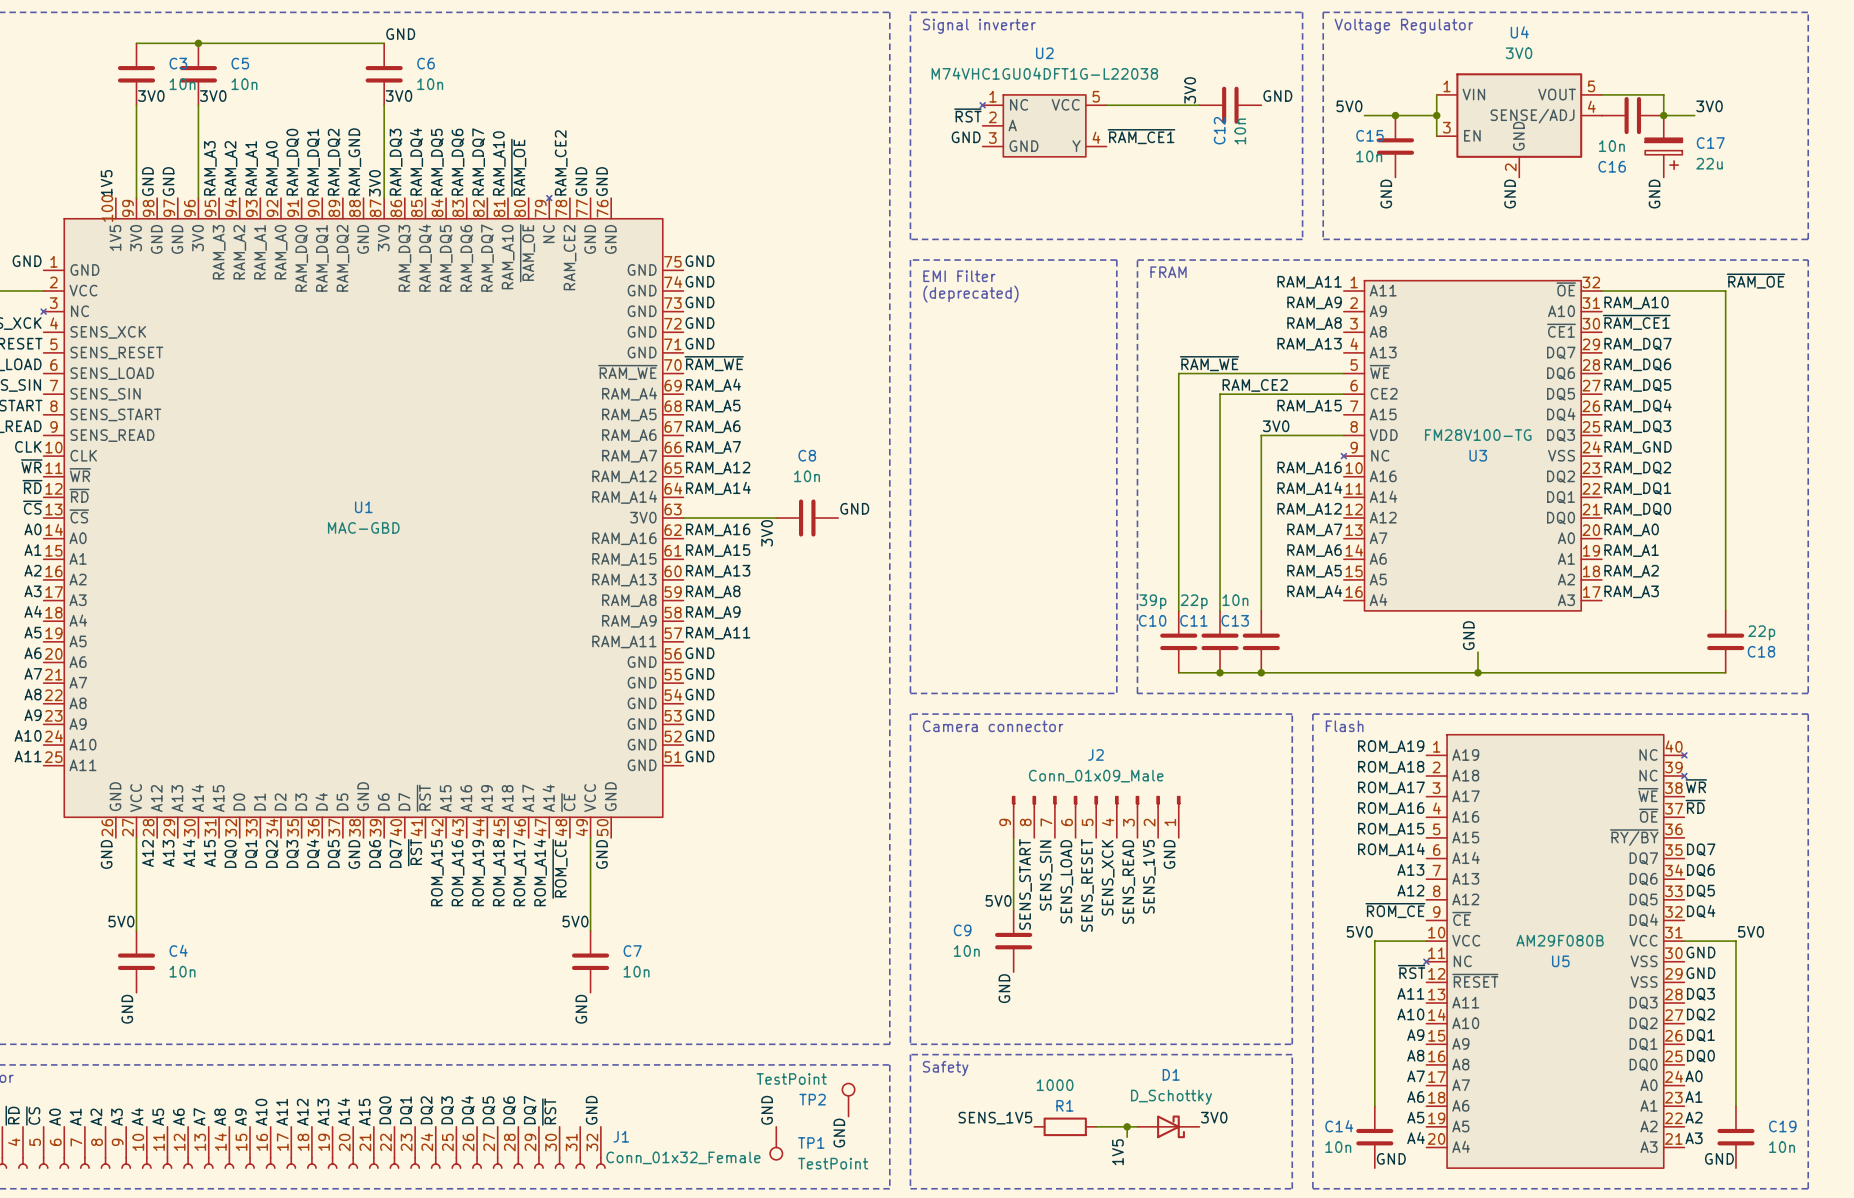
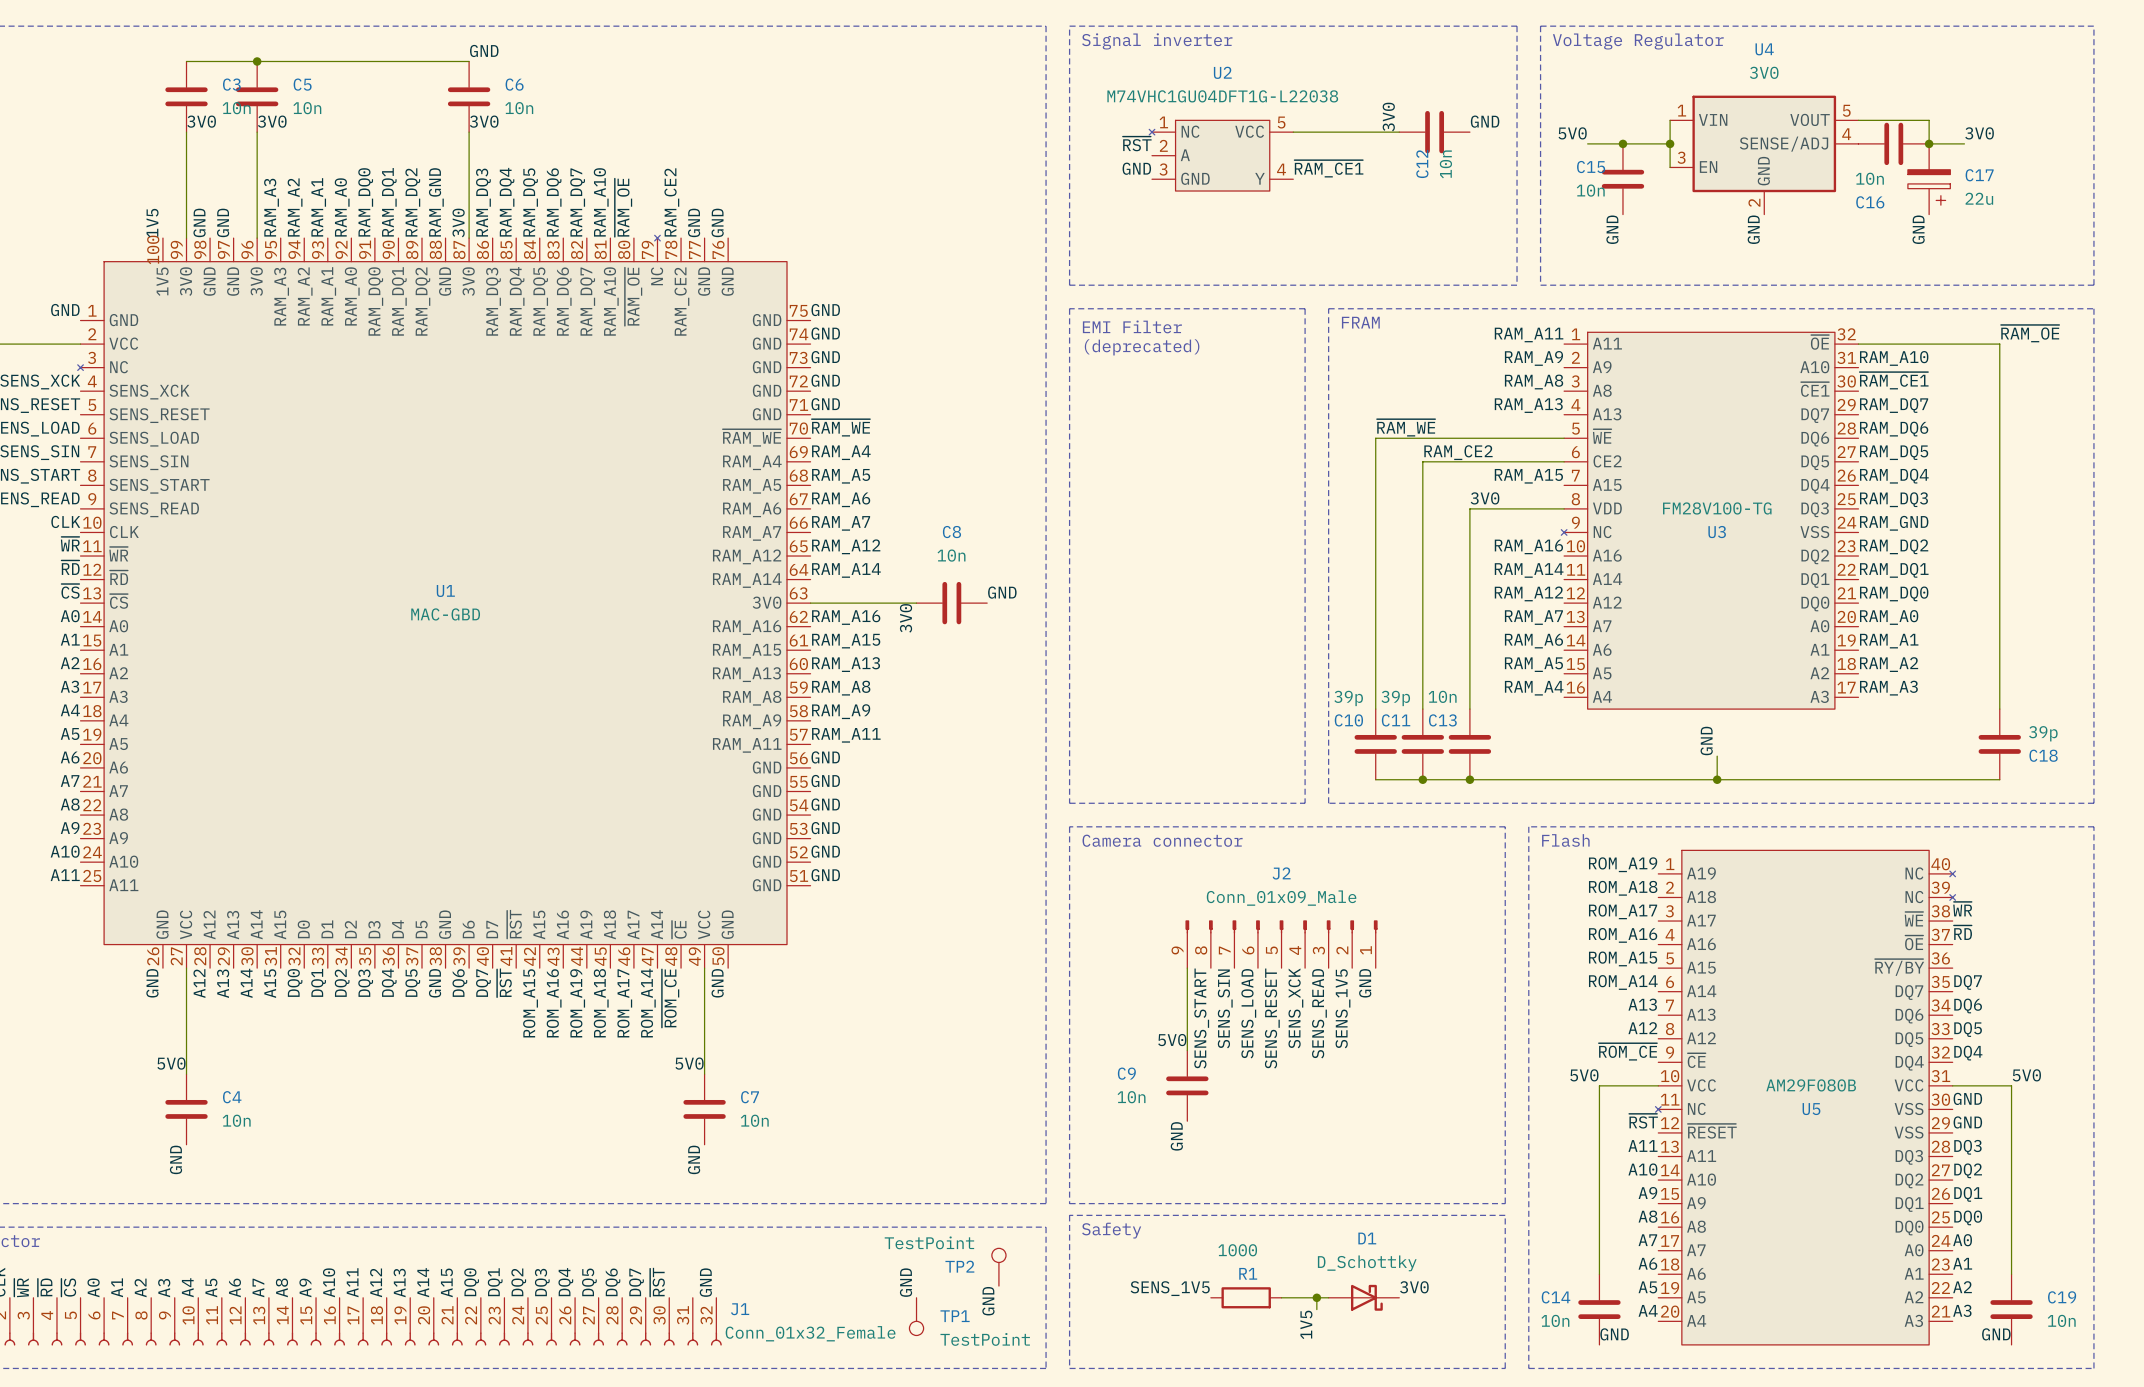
C11 value: 22p (1194, 601) -> 39p (1395, 698)
C18 value: 22p (1761, 632) -> 39p (2043, 733)

